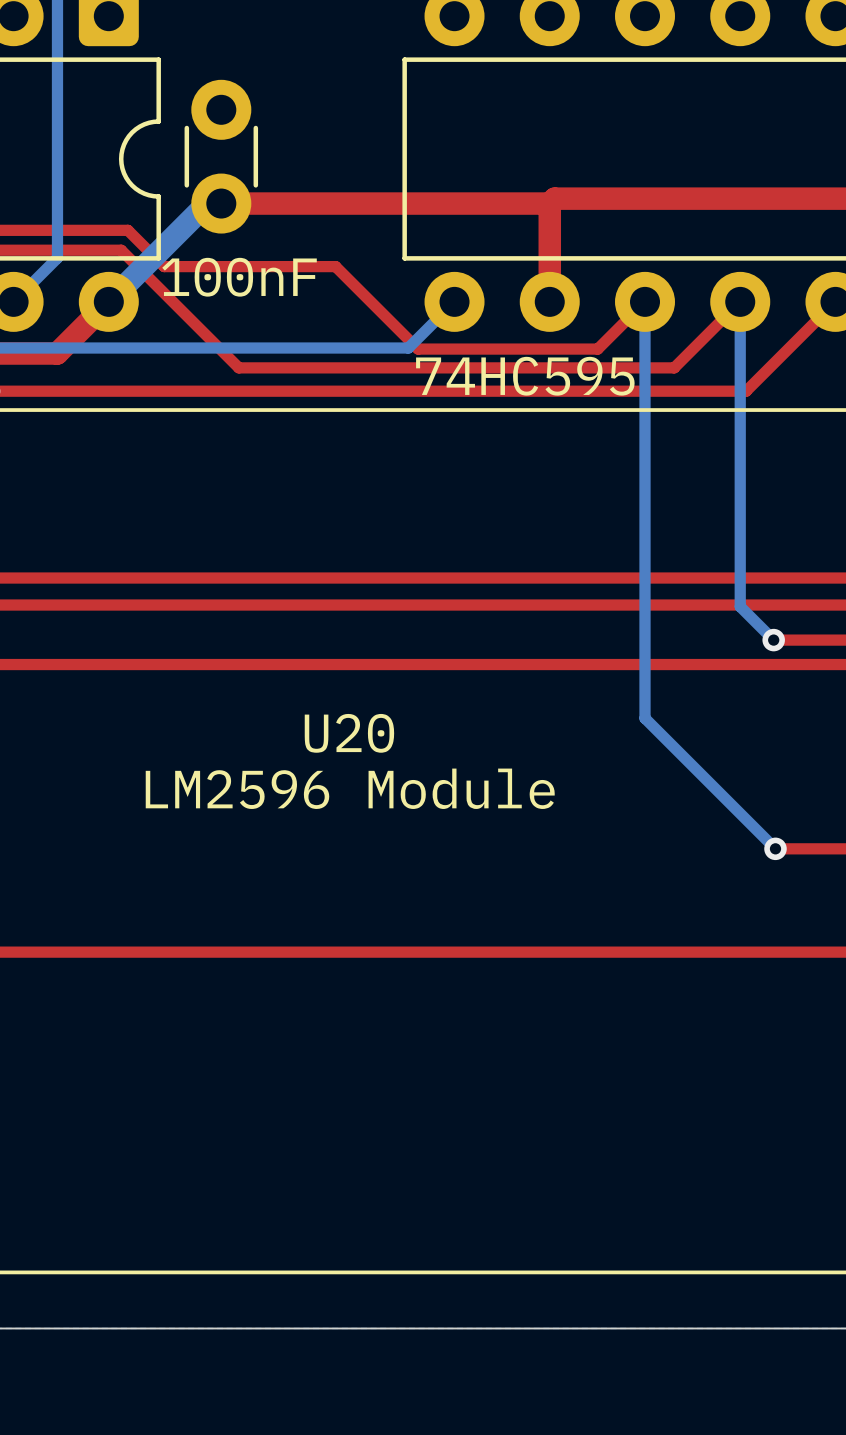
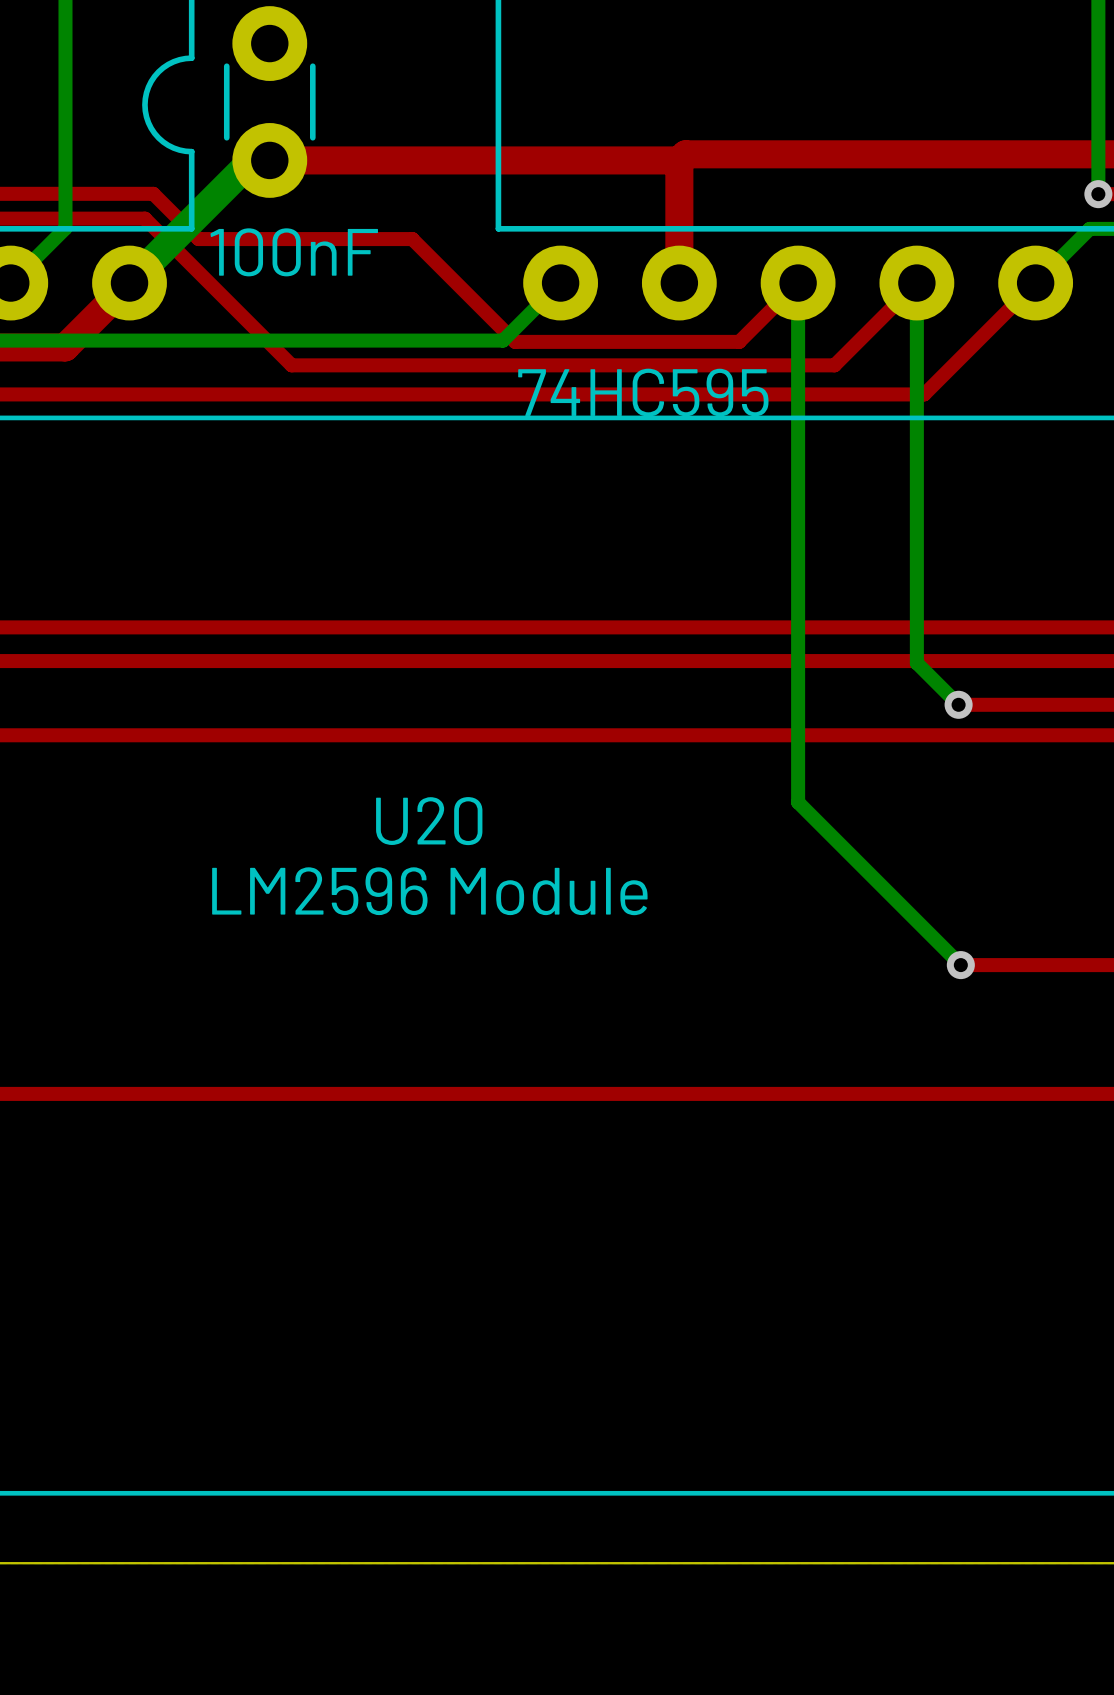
part value position: 74HC595 (525, 376) -> 74HC595 (643, 392)

